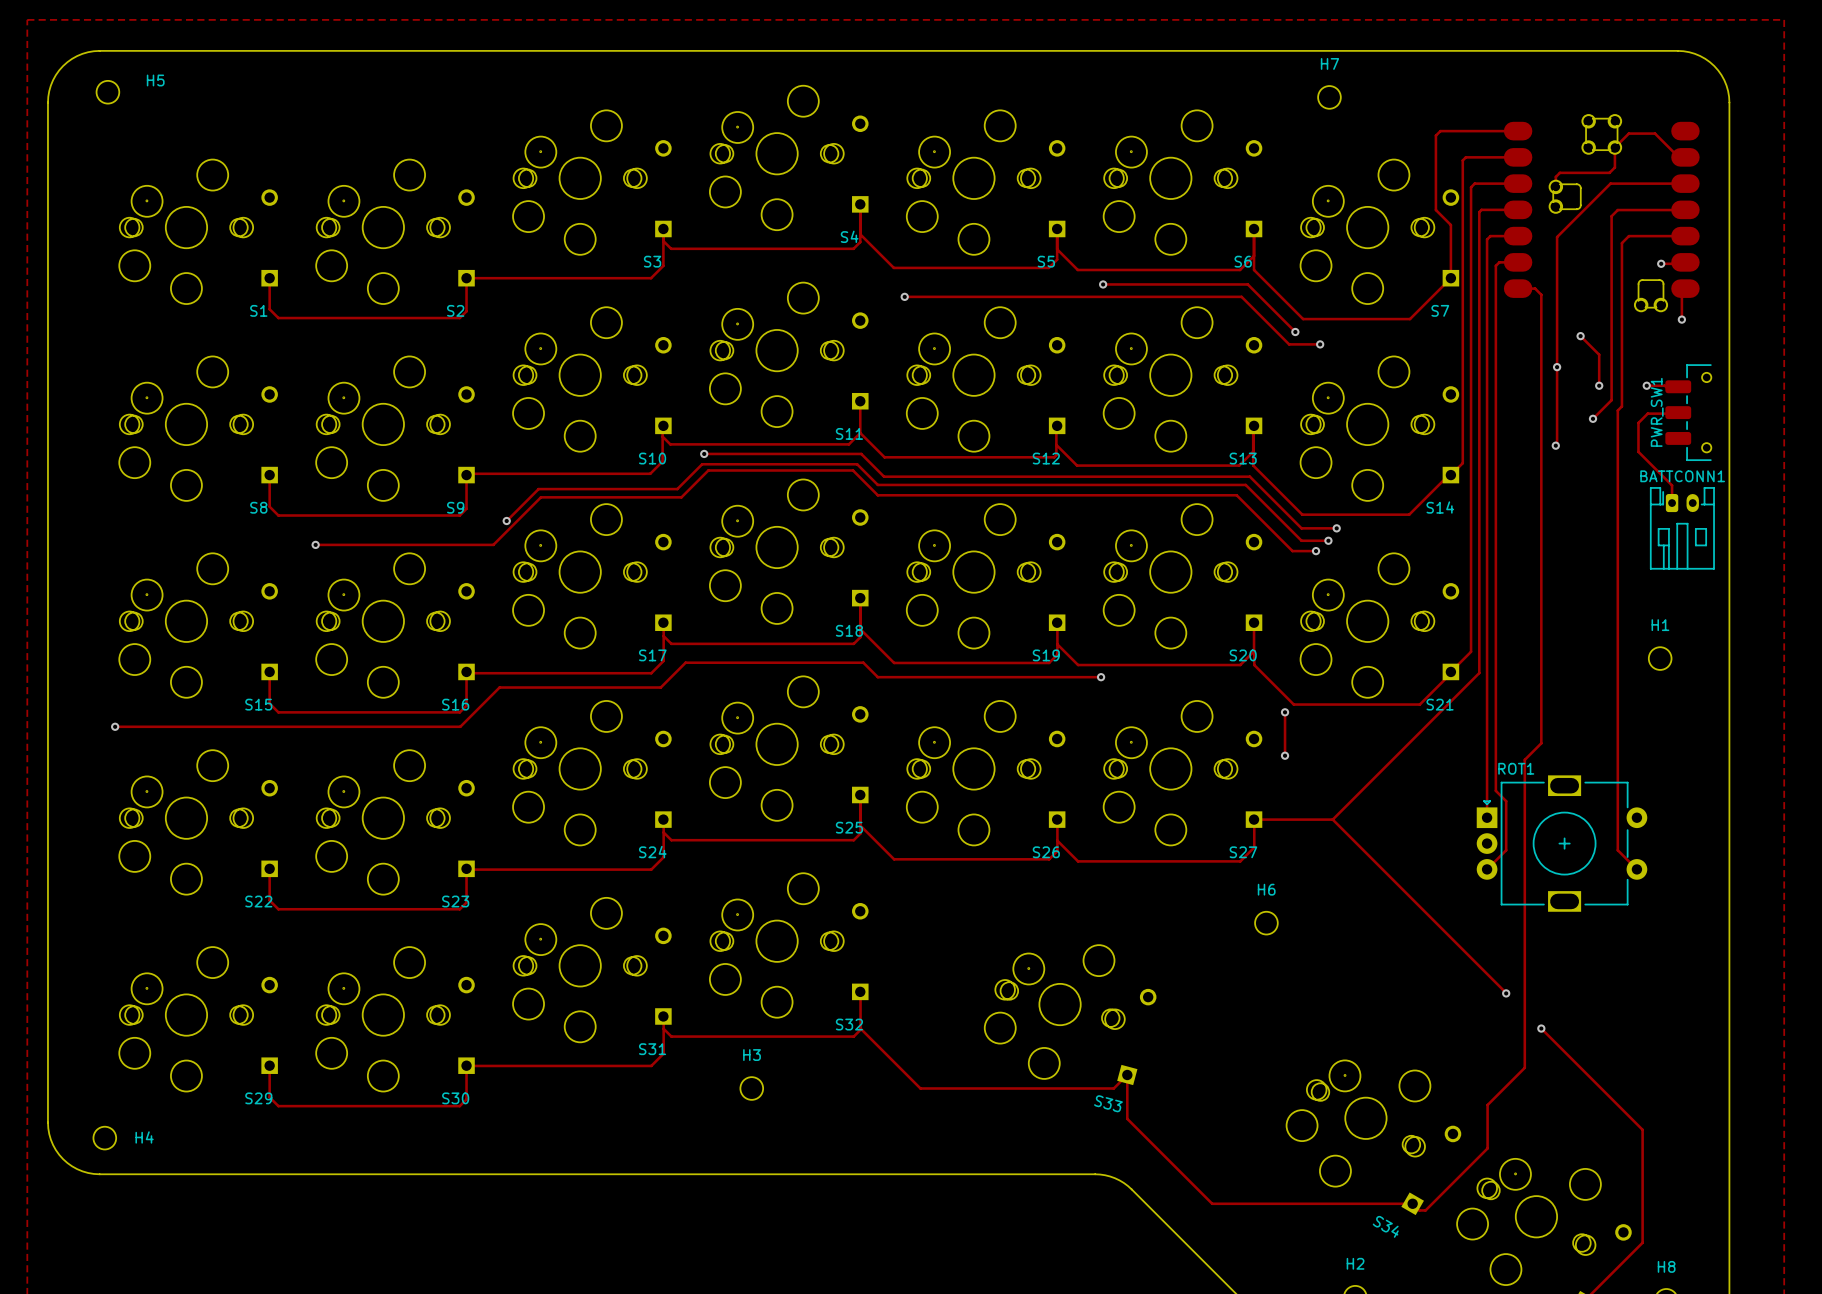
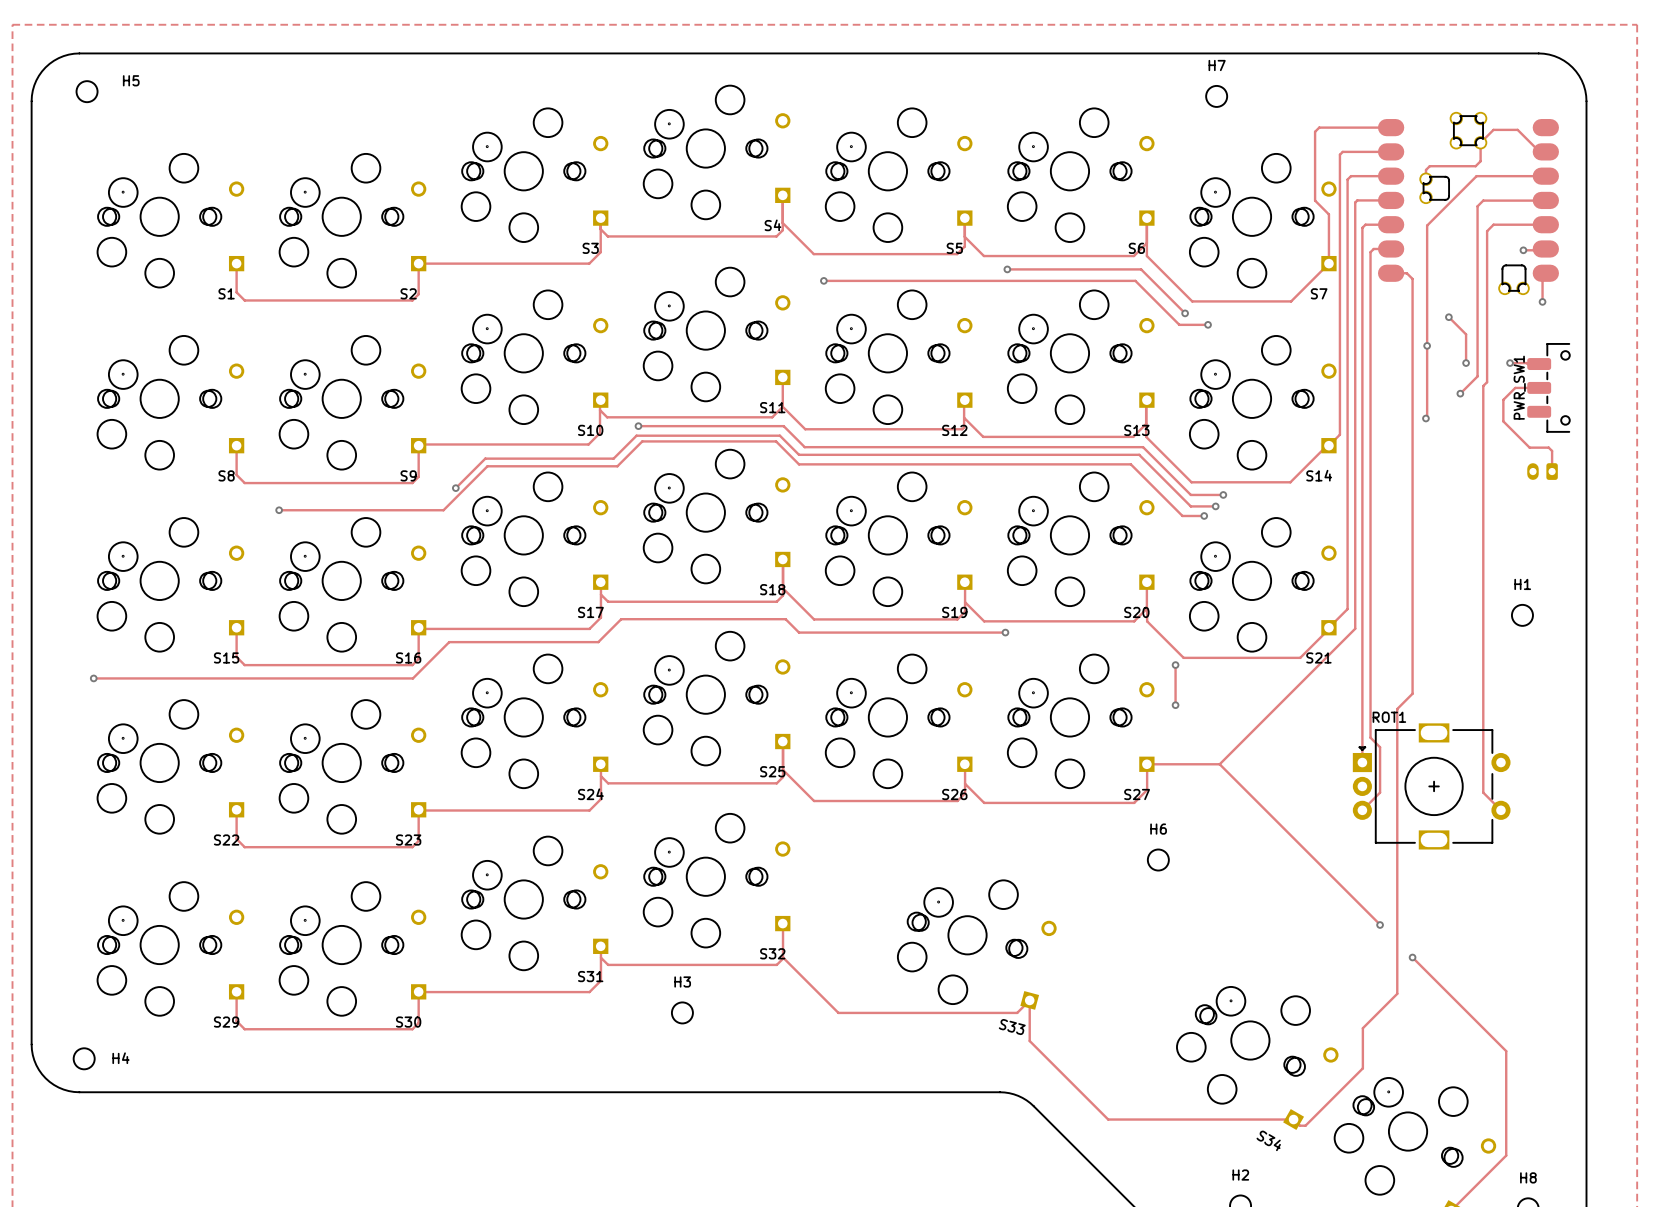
track: none -> (1539, 387) (1515, 387) (1503, 399) (1503, 421) (1529, 447) (1548, 447) (1552, 450) (1552, 471)
track: (1666, 413) (1647, 413) (1638, 422) (1638, 451) (1672, 485) (1672, 503) -> none
BATTCONN1 side: top (1682, 528) -> bottom (1542, 471)

